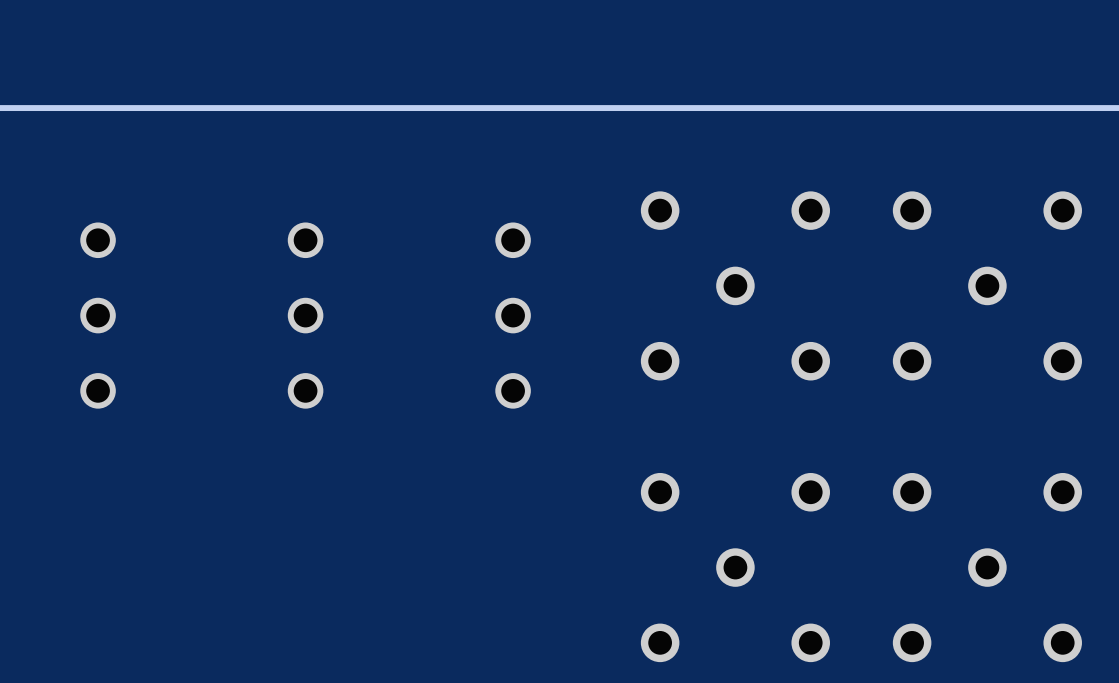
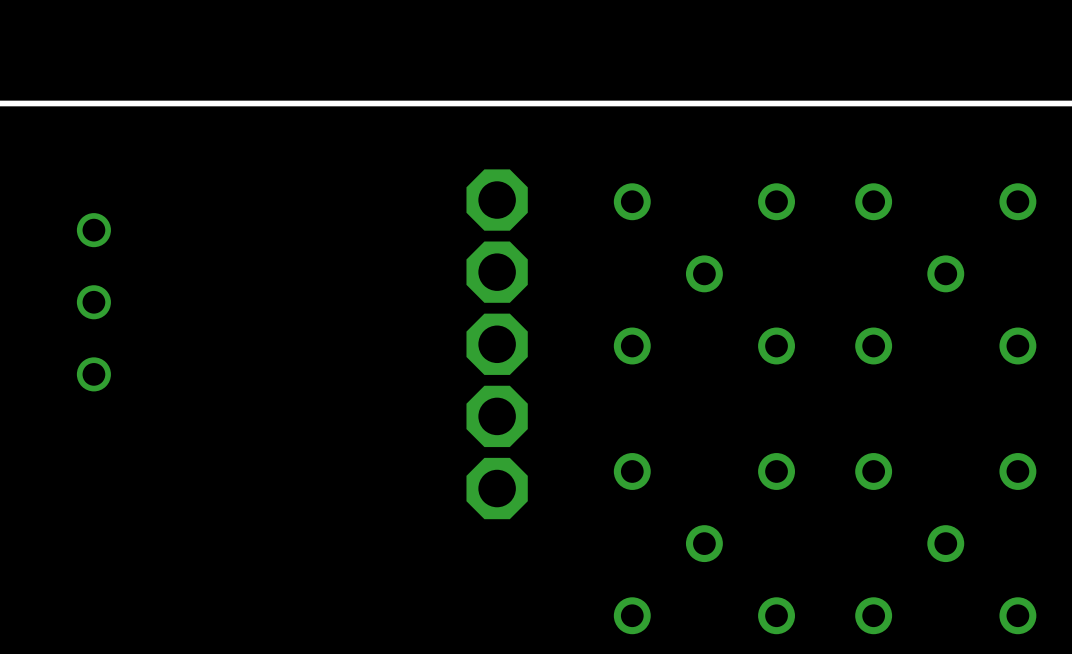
part: none -> (497, 200)
part: none -> (497, 272)
part: (305, 315) -> none
part: (513, 315) -> none
part: none -> (497, 344)
part: none -> (497, 416)
part: none -> (497, 488)

